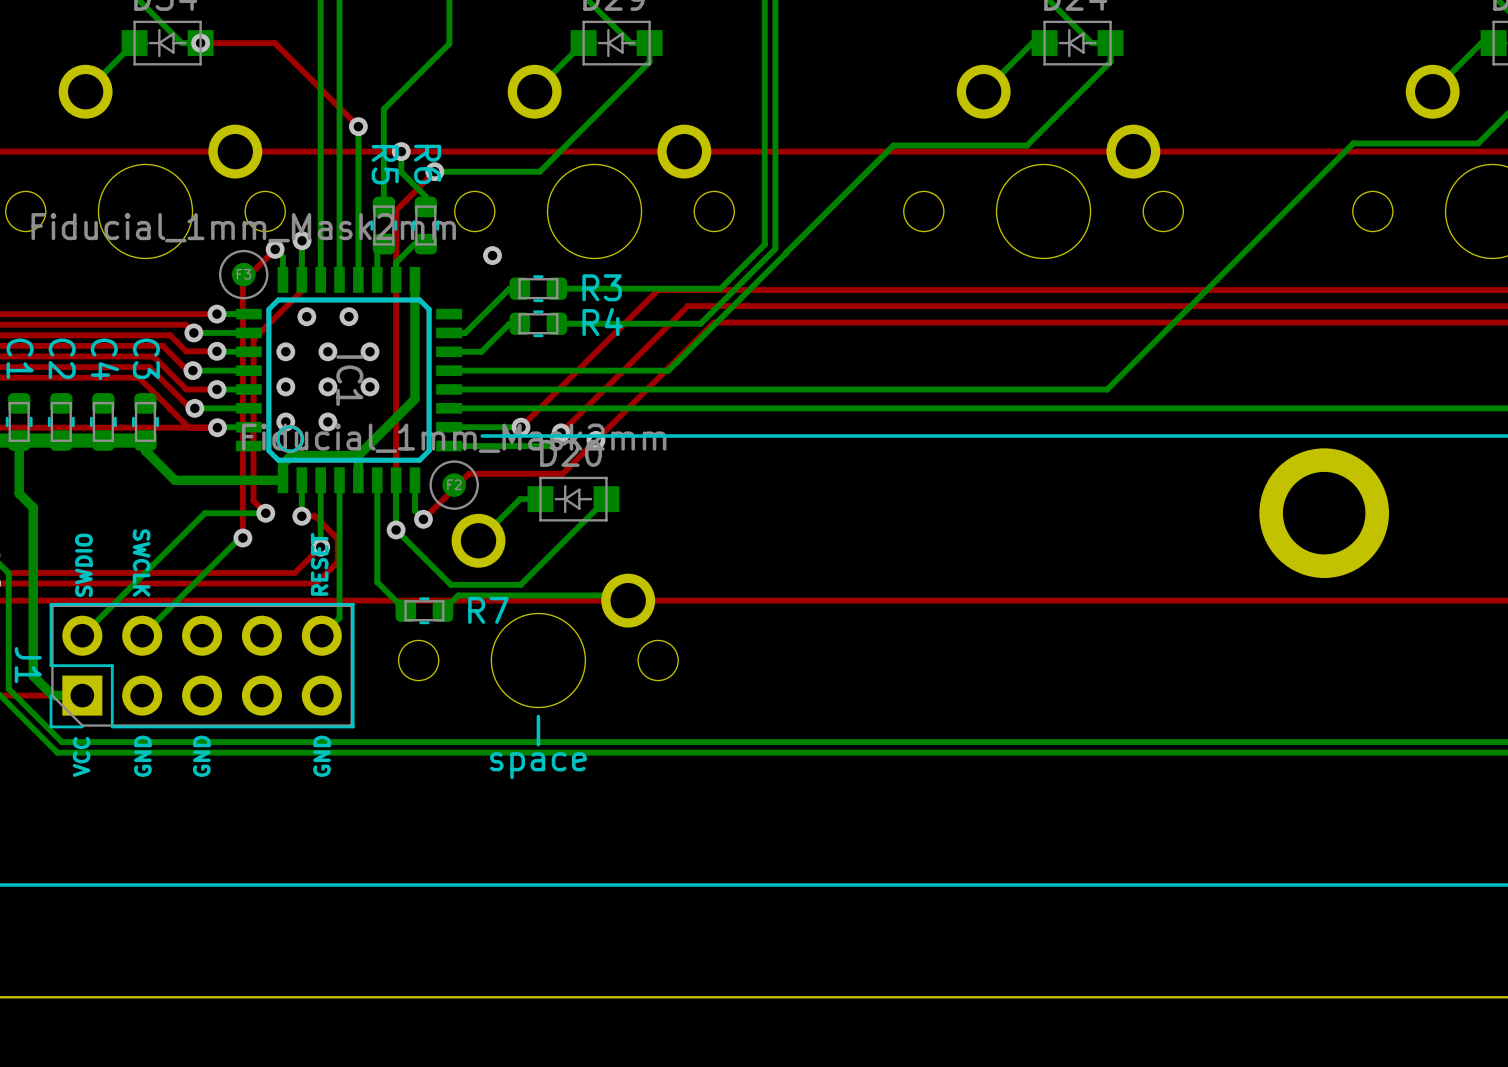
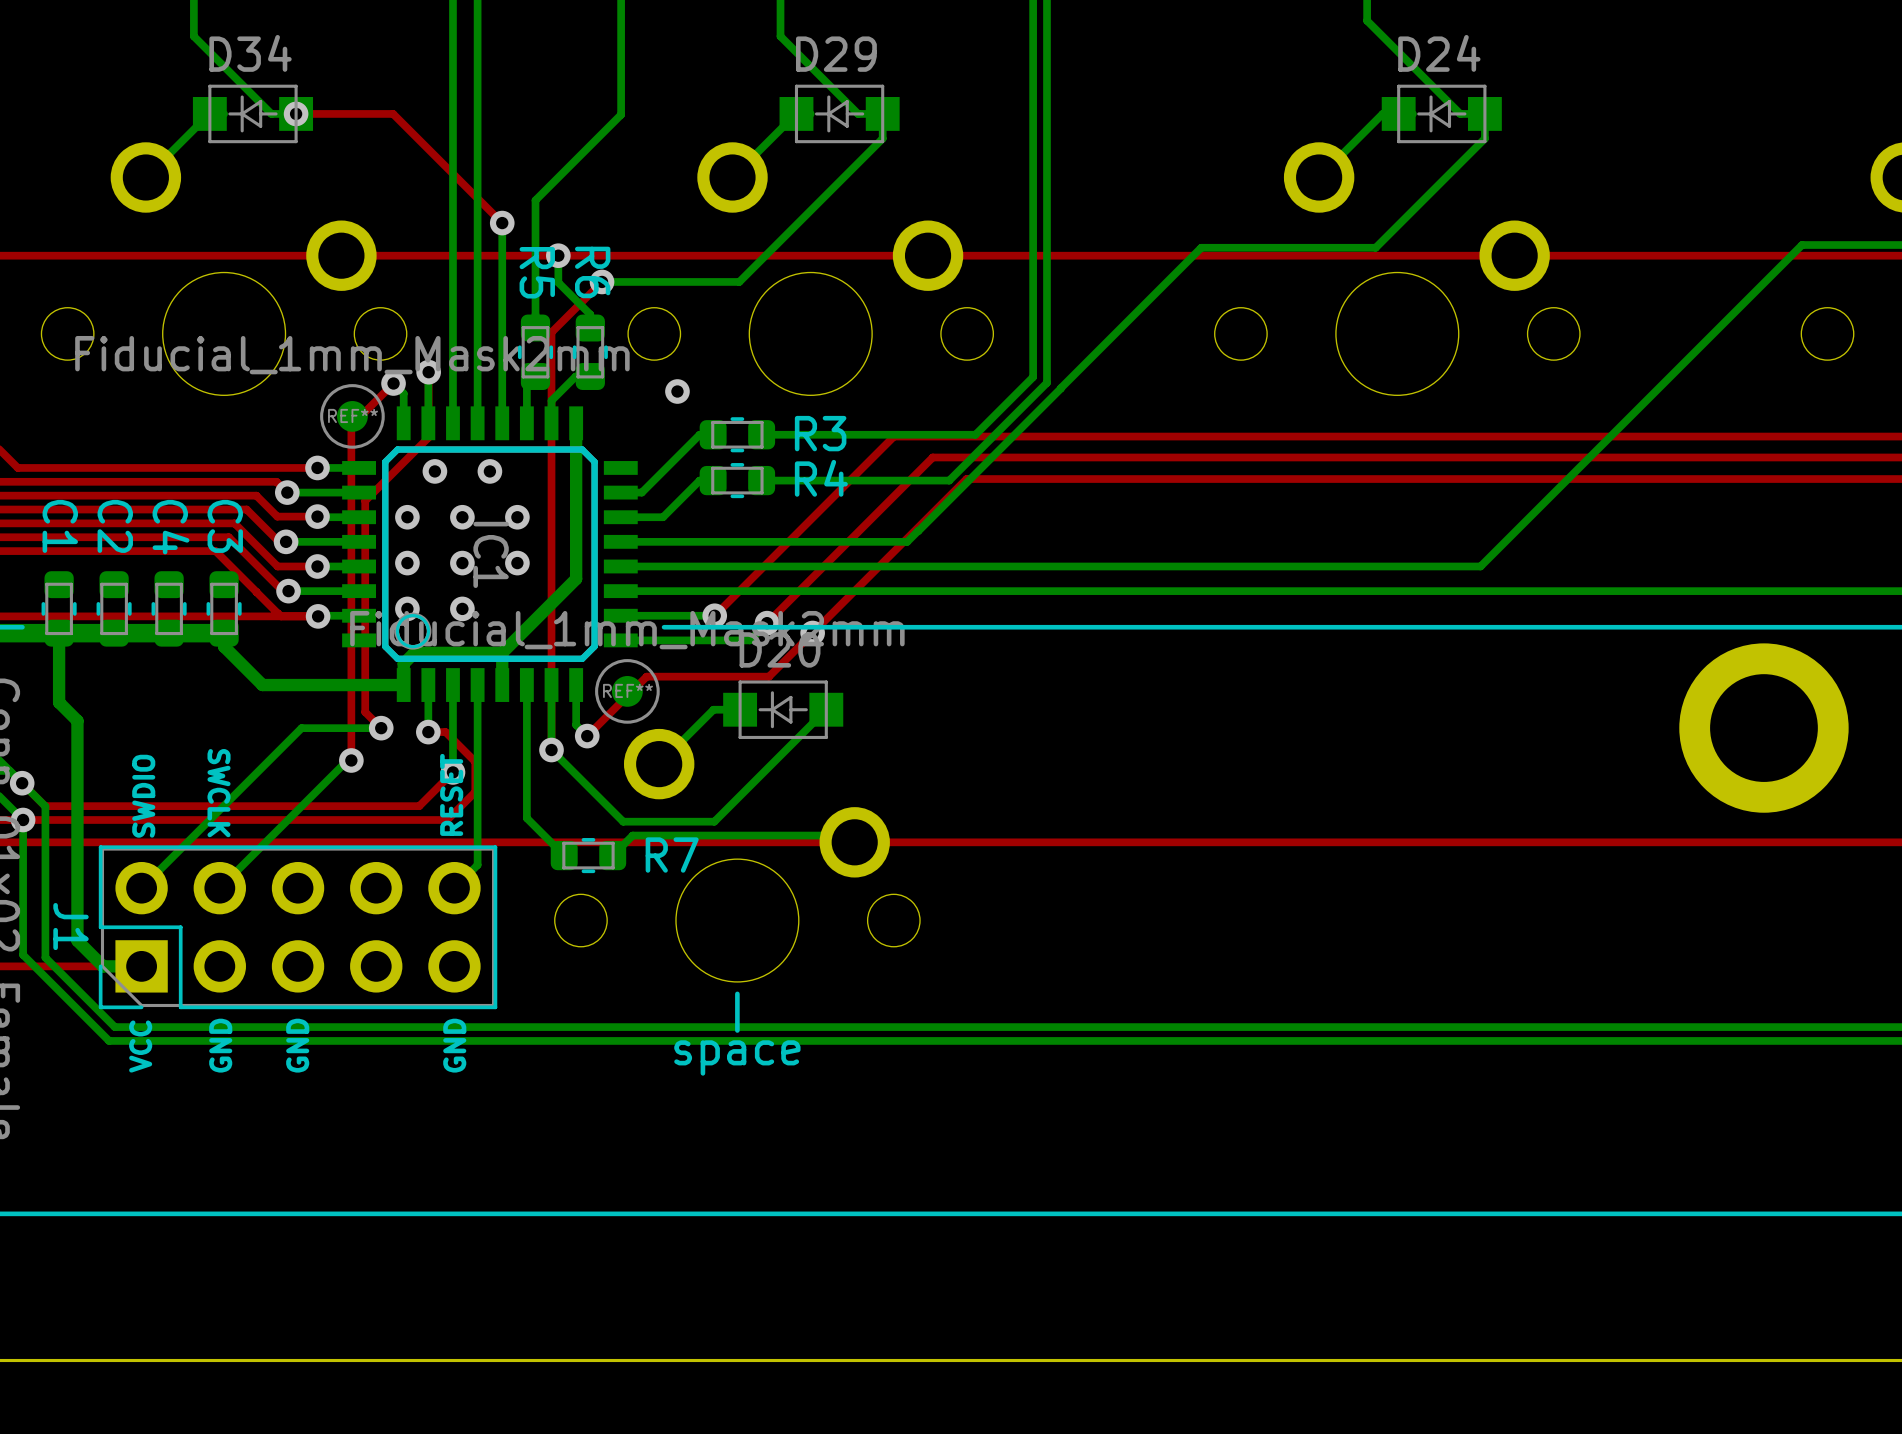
F3 name: F3 (243, 274) -> REF** (353, 415)
F2 name: F2 (454, 484) -> REF** (627, 690)

